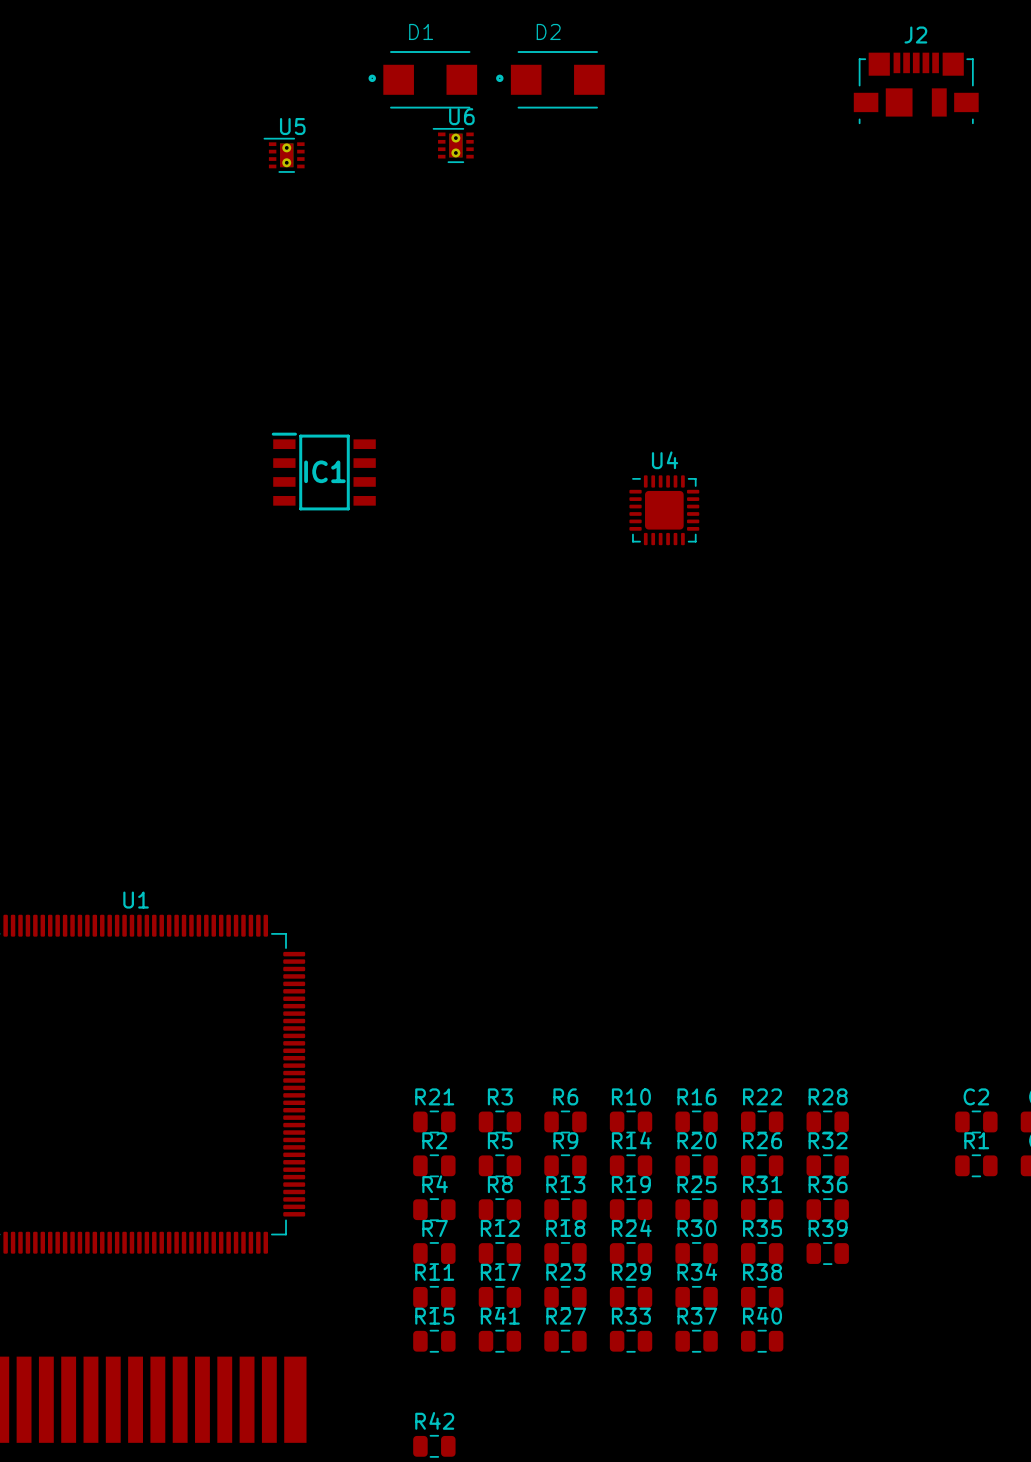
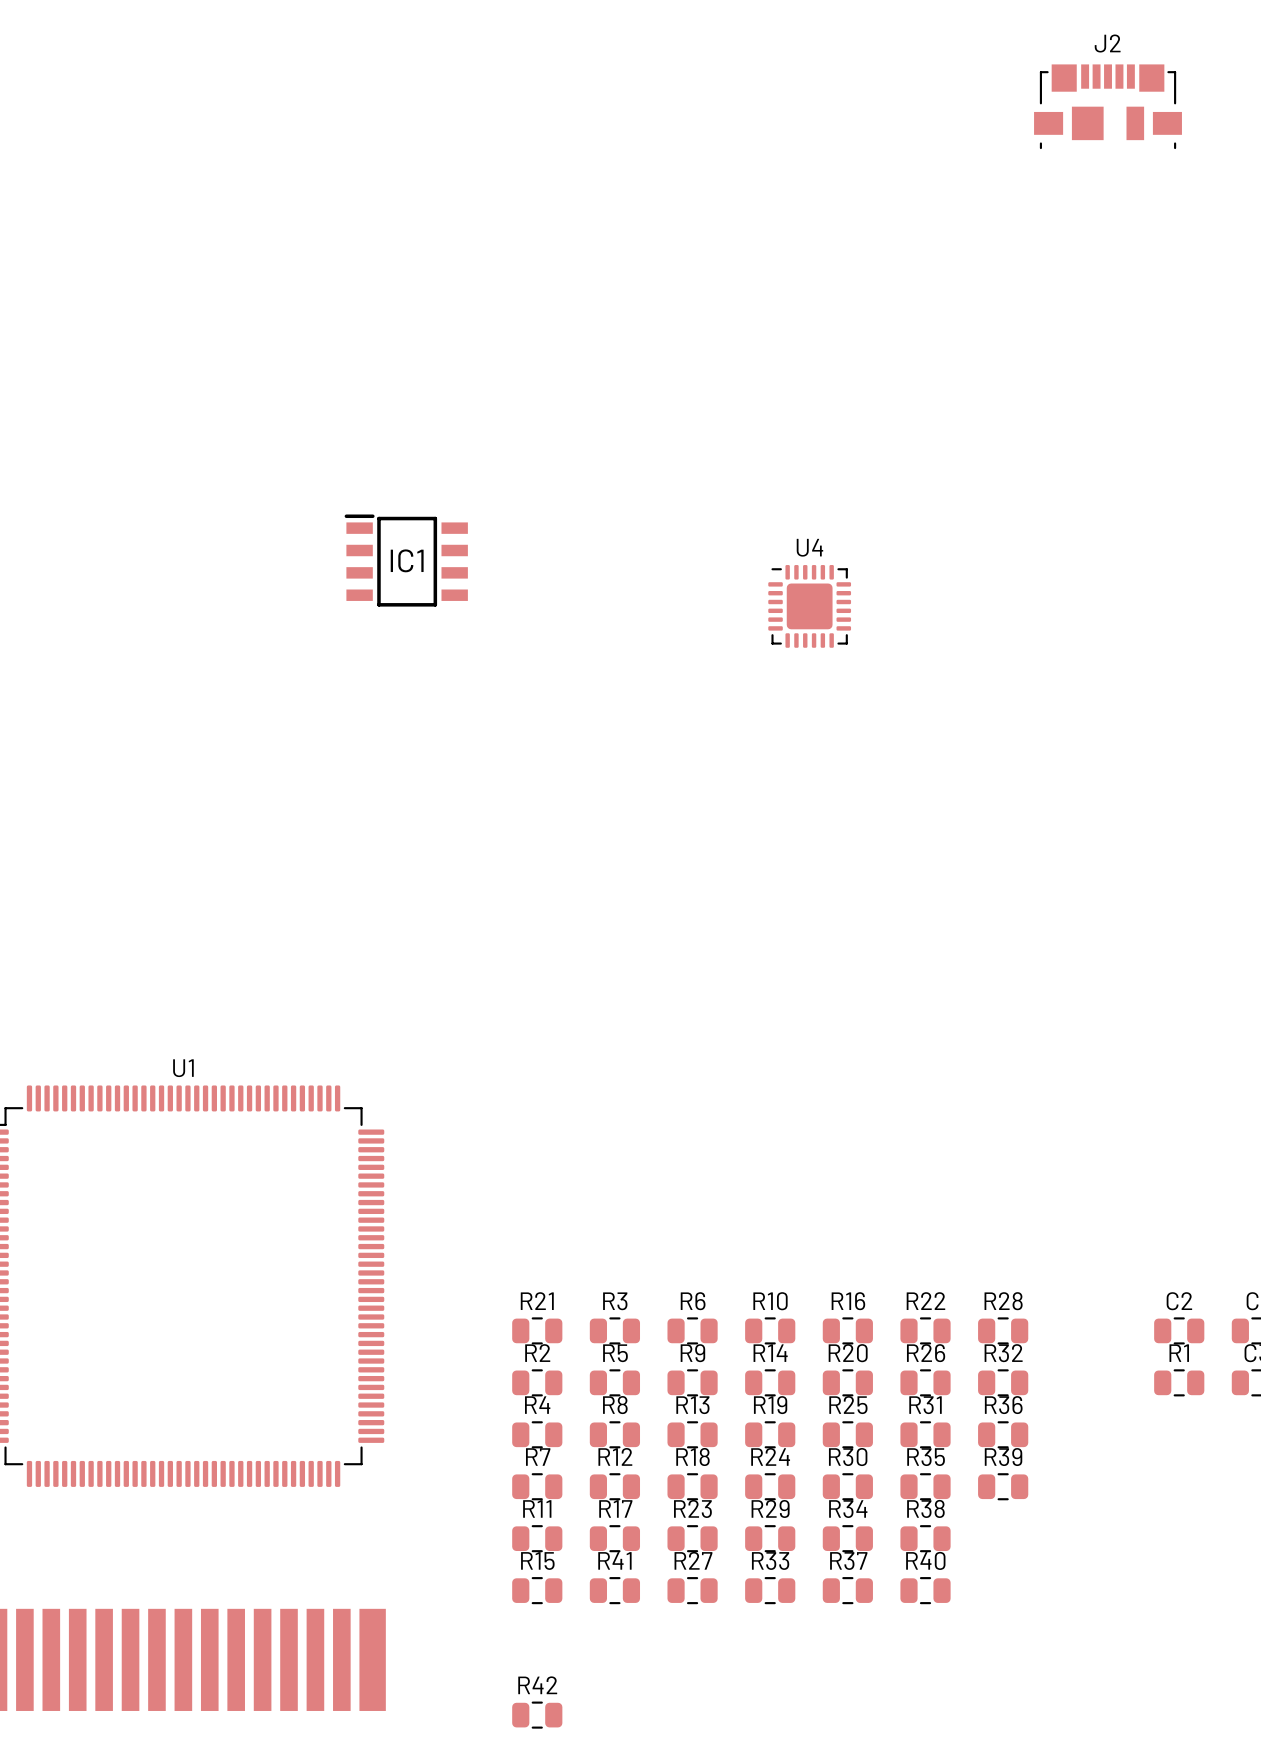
D1: (422, 79) -> none
D2: (550, 79) -> none
U6: (453, 145) -> none
U5: (284, 155) -> none

